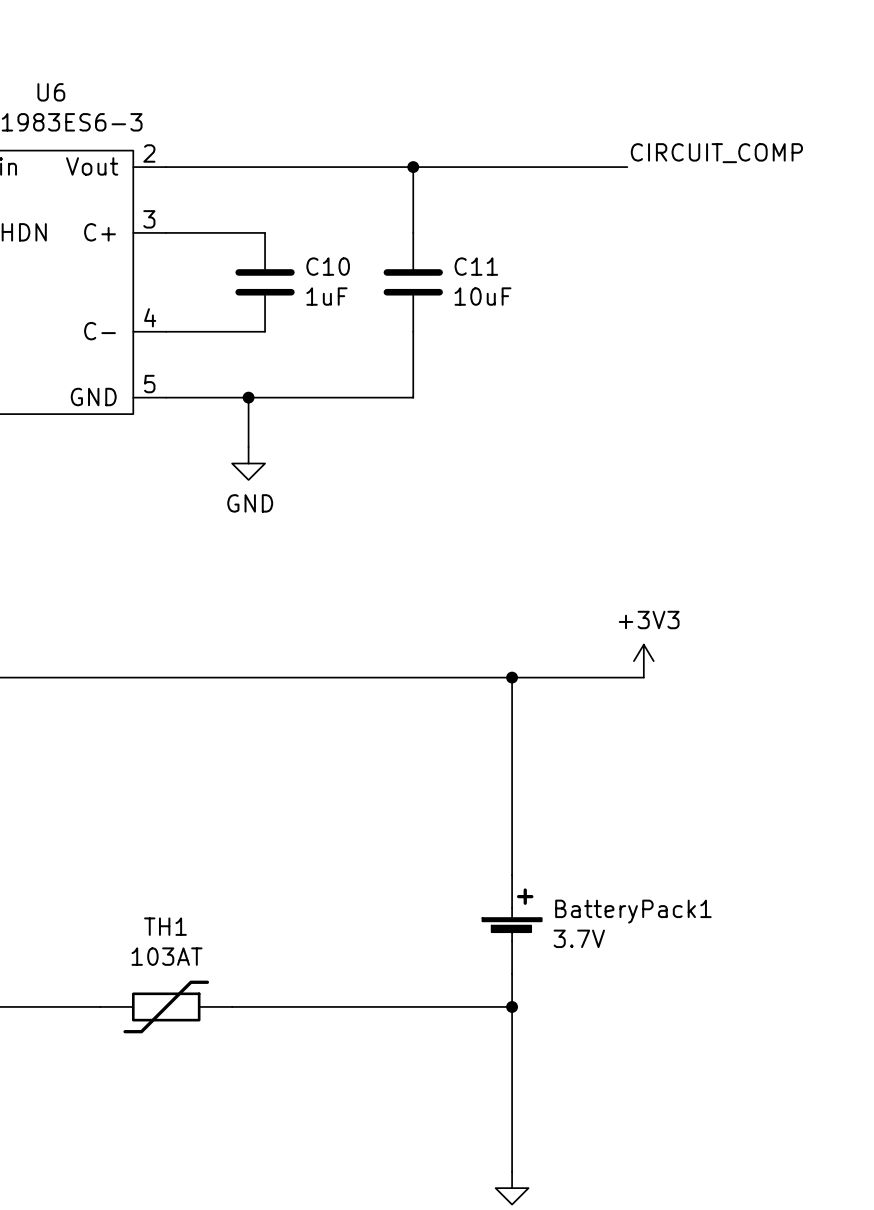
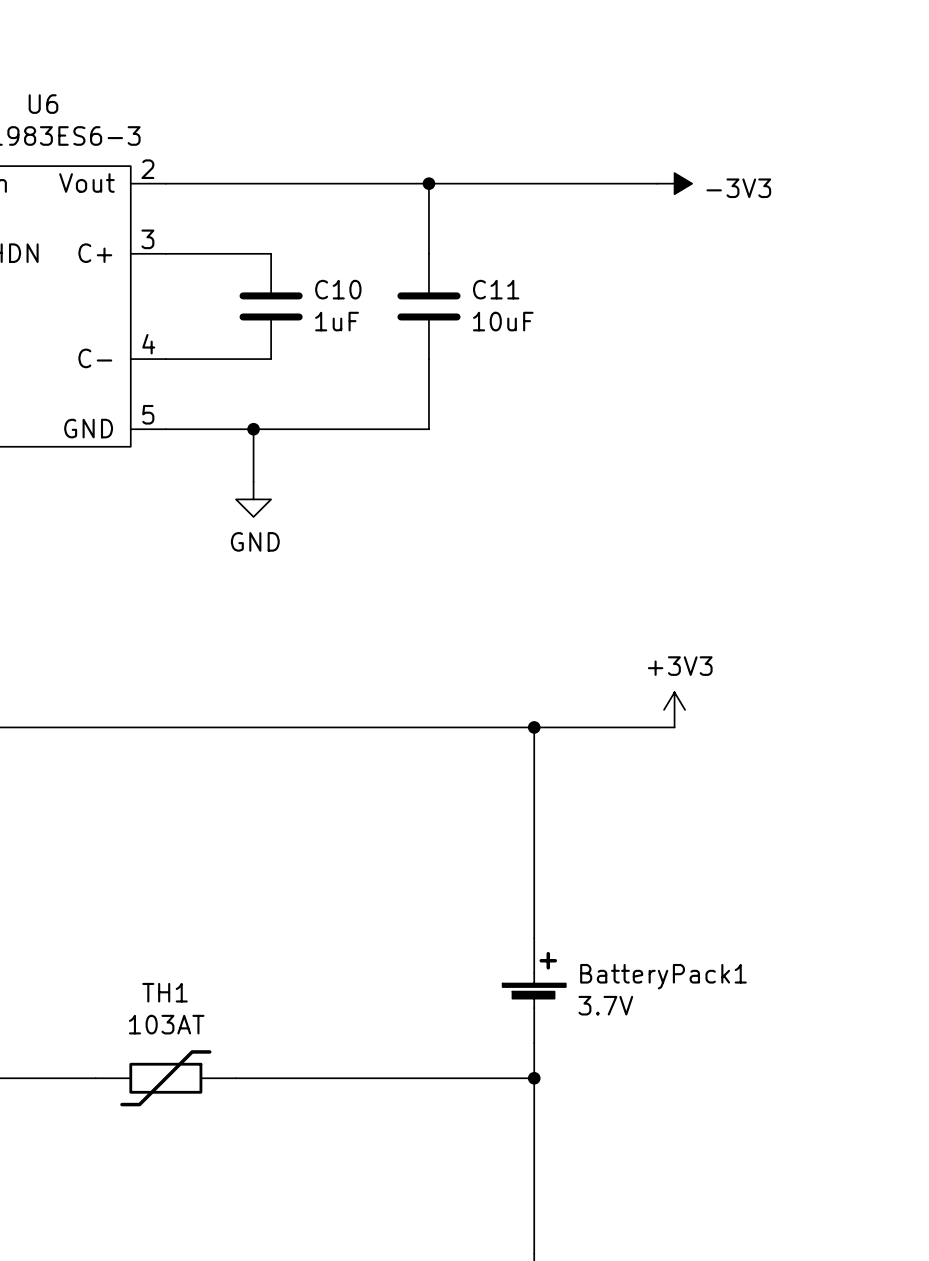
label: CIRCUIT_COMP (716, 153) -> none
power symbol: none -> -3V3 (674, 183)

